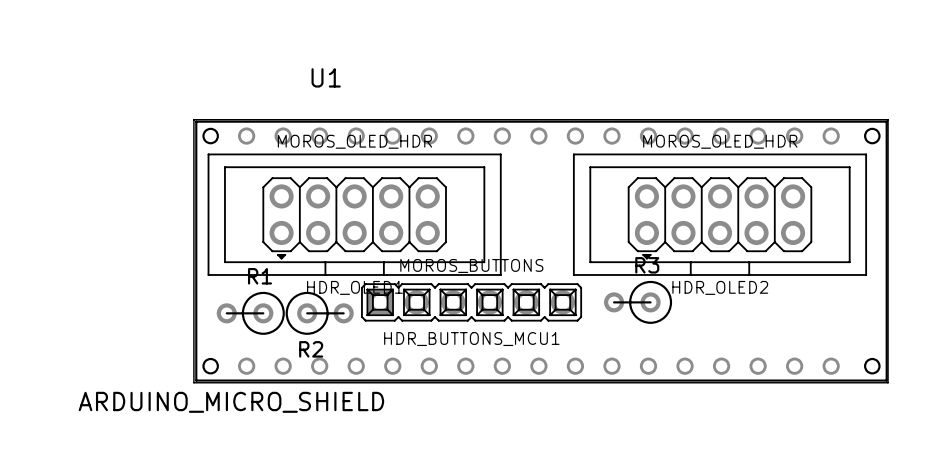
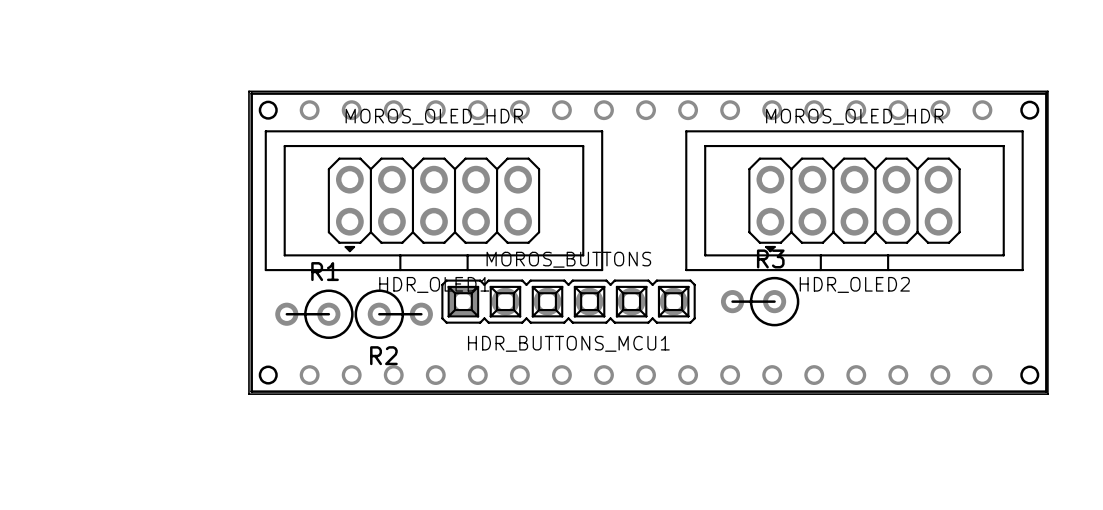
U1 name: U1 (326, 77) -> none
U1 value: ARDUINO_MICRO_SHIELD (231, 402) -> none

